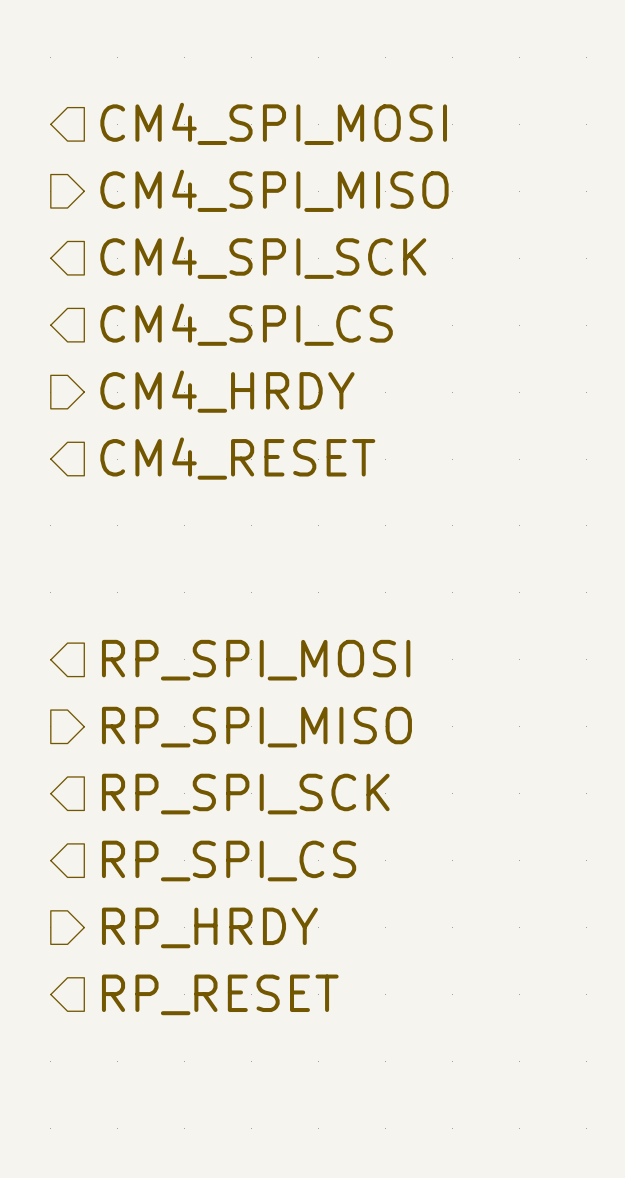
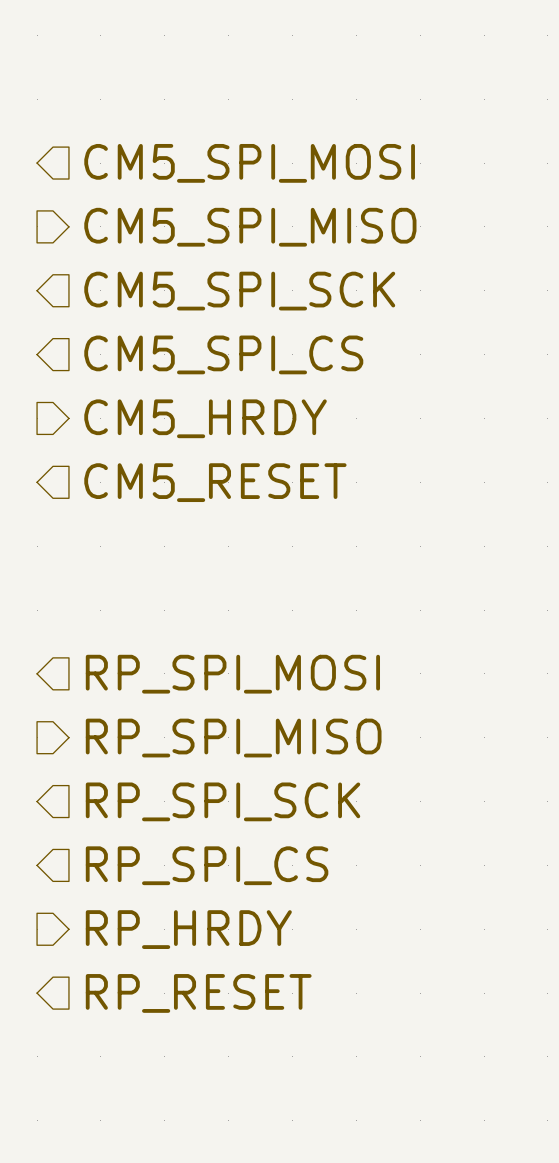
hierarchical label: CM4_SPI_MOSI (273, 123) -> CM5_SPI_MOSI (249, 163)
hierarchical label: CM4_SPI_MISO (274, 190) -> CM5_SPI_MISO (250, 227)
hierarchical label: CM4_SPI_SCK (263, 257) -> CM5_SPI_SCK (239, 291)
hierarchical label: CM4_SPI_CS (246, 324) -> CM5_SPI_CS (223, 354)
hierarchical label: CM4_HRDY (227, 391) -> CM5_HRDY (205, 418)
hierarchical label: CM4_RESET (237, 458) -> CM5_RESET (215, 482)

